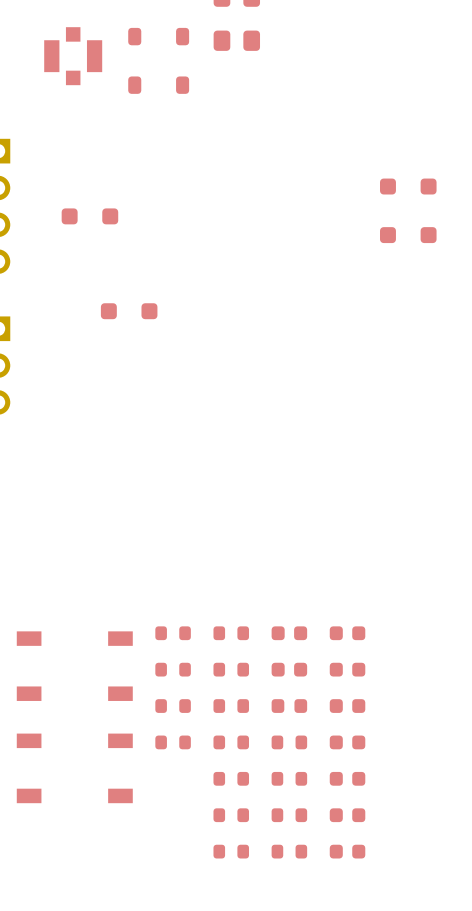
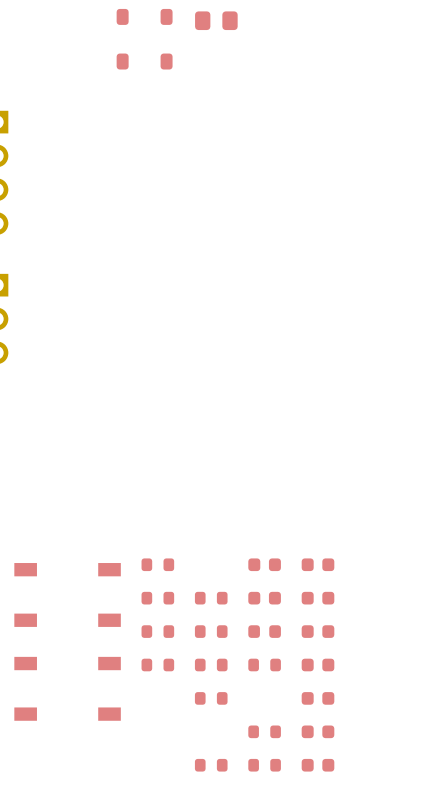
part: (73, 56) -> none
part: (408, 186) -> none
part: (89, 216) -> none
part: (408, 235) -> none
part: (129, 311) -> none
part: (231, 633) -> none
part: (289, 778) -> none
part: (231, 815) -> none

